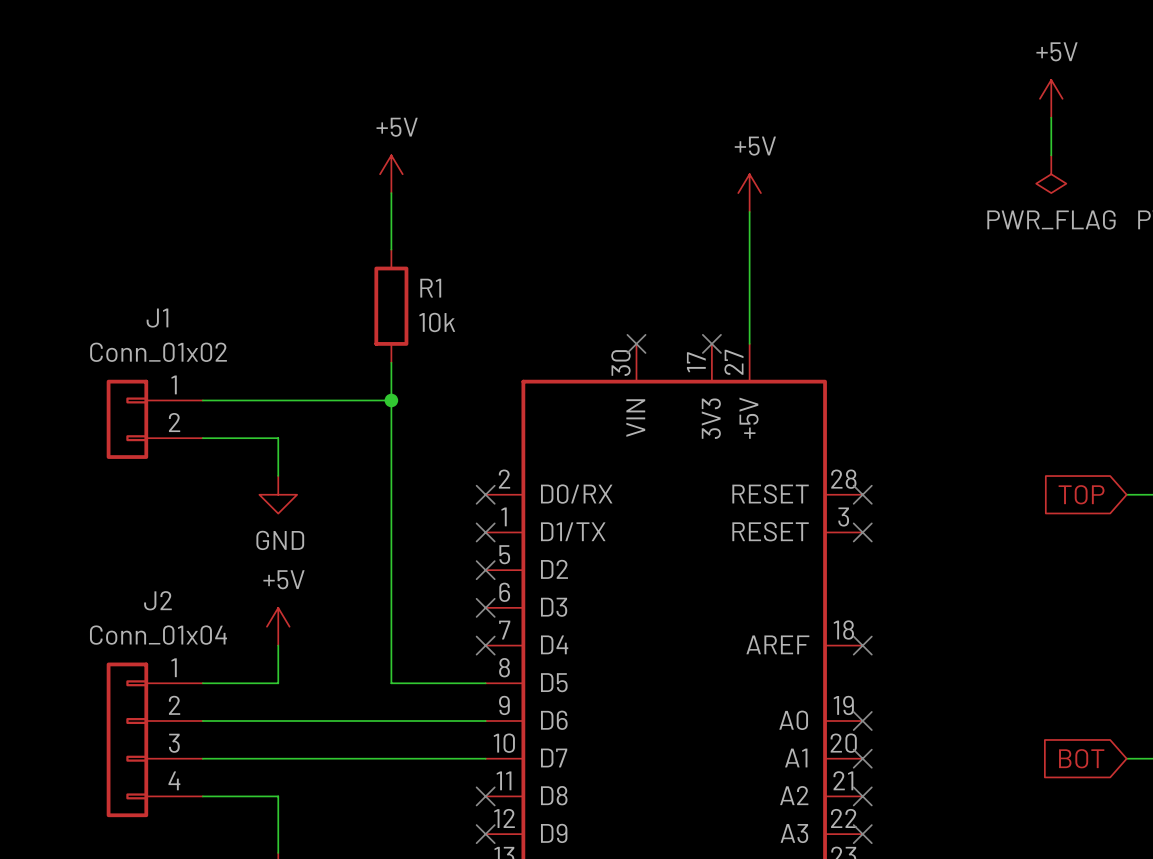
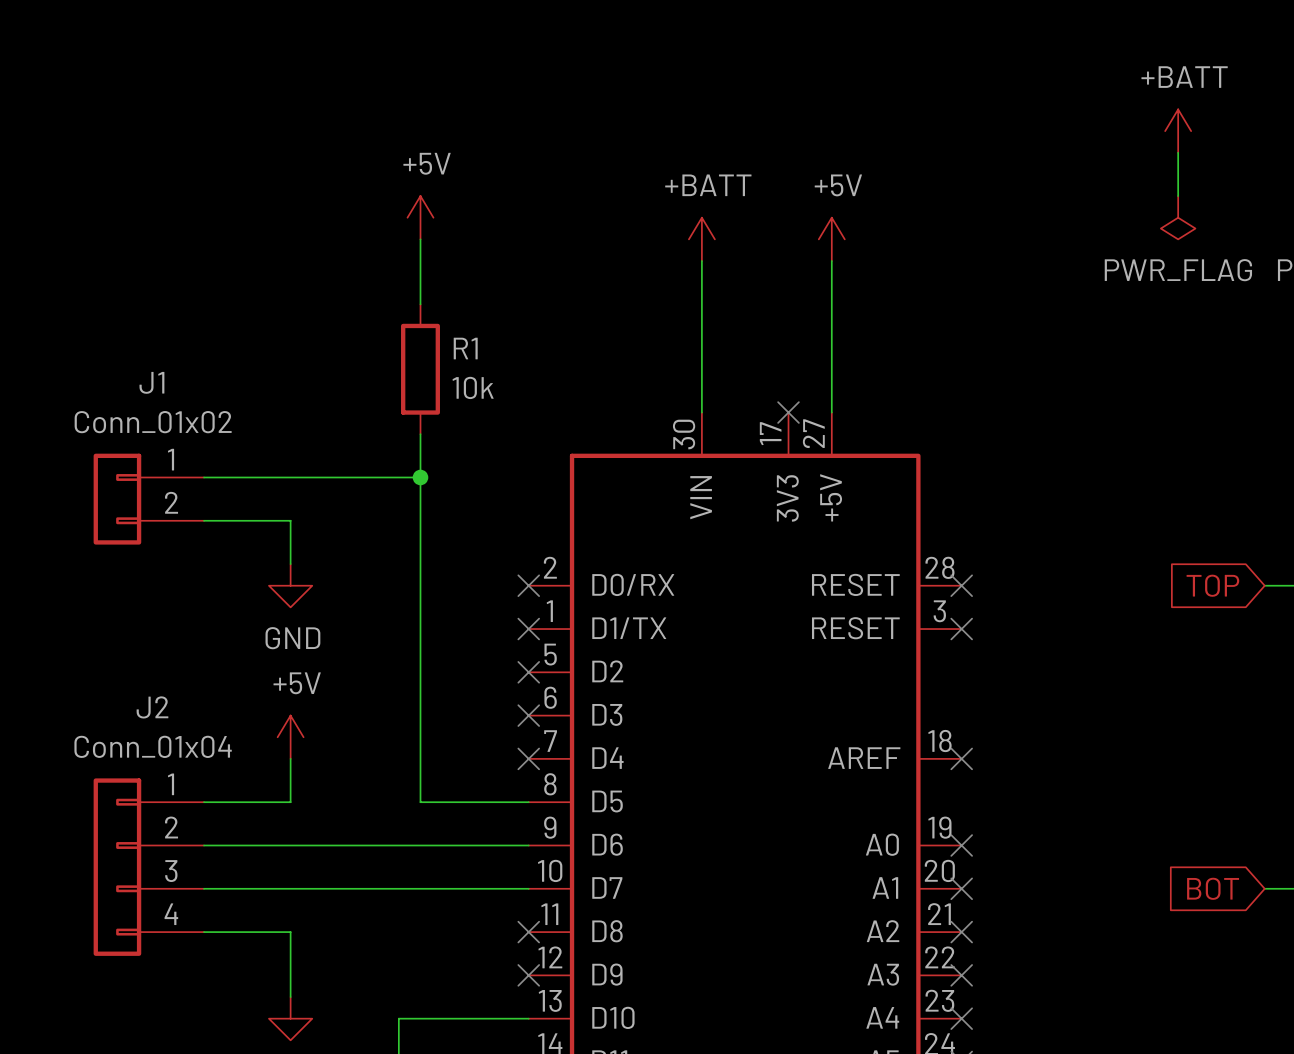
power symbol: +5V (1051, 98) -> +BATT (1178, 131)
power symbol: none -> +BATT (701, 239)
wire: none -> (701, 261) (701, 412)
no-connect mark: (636, 343) -> none

